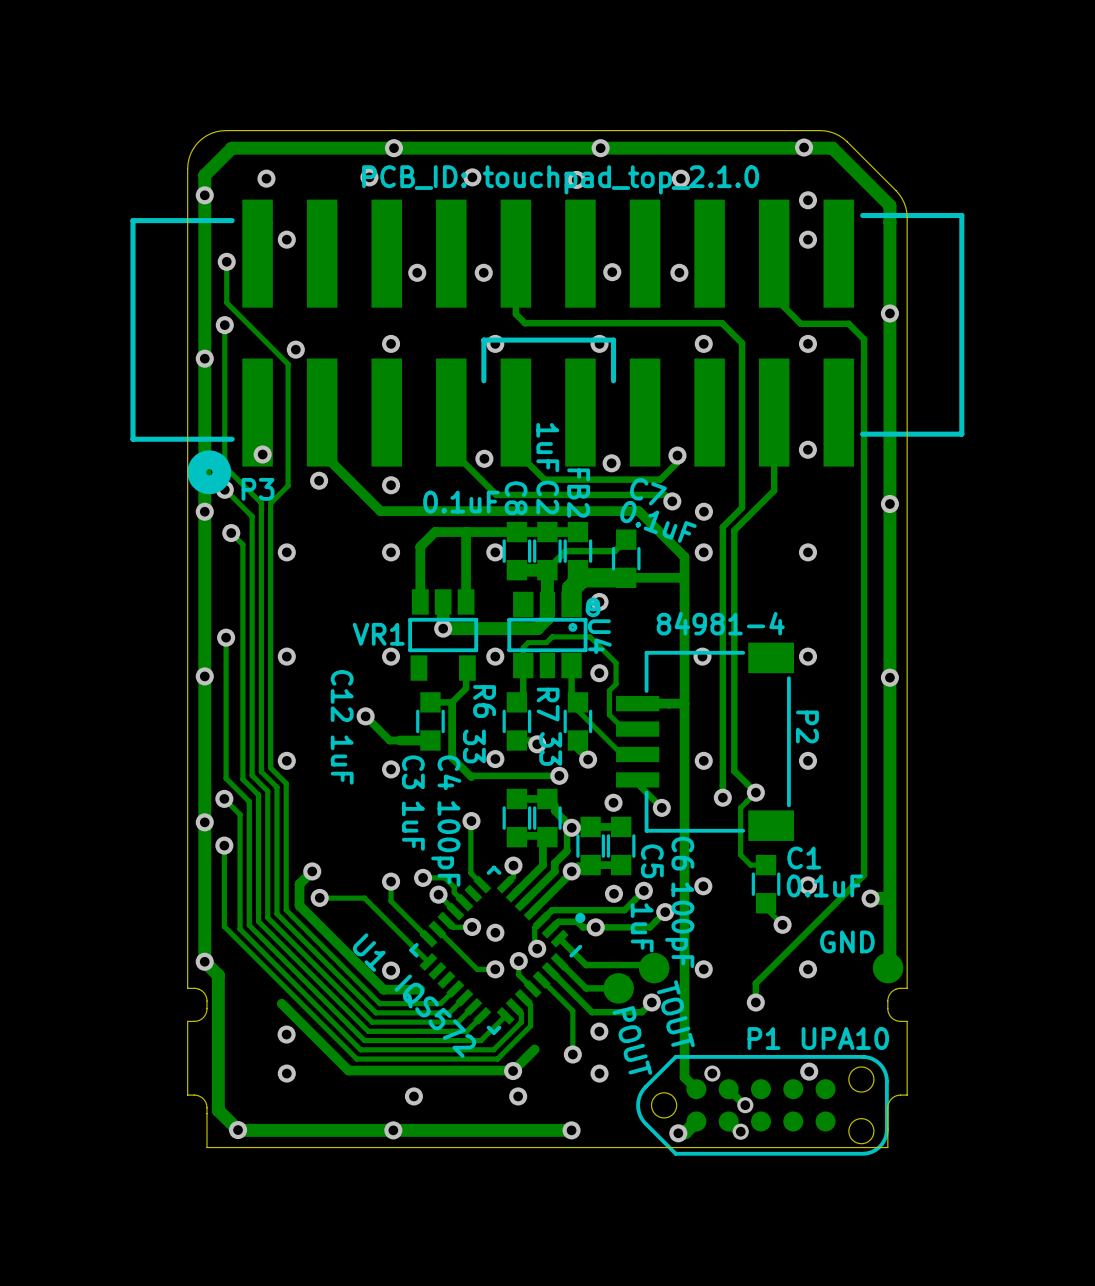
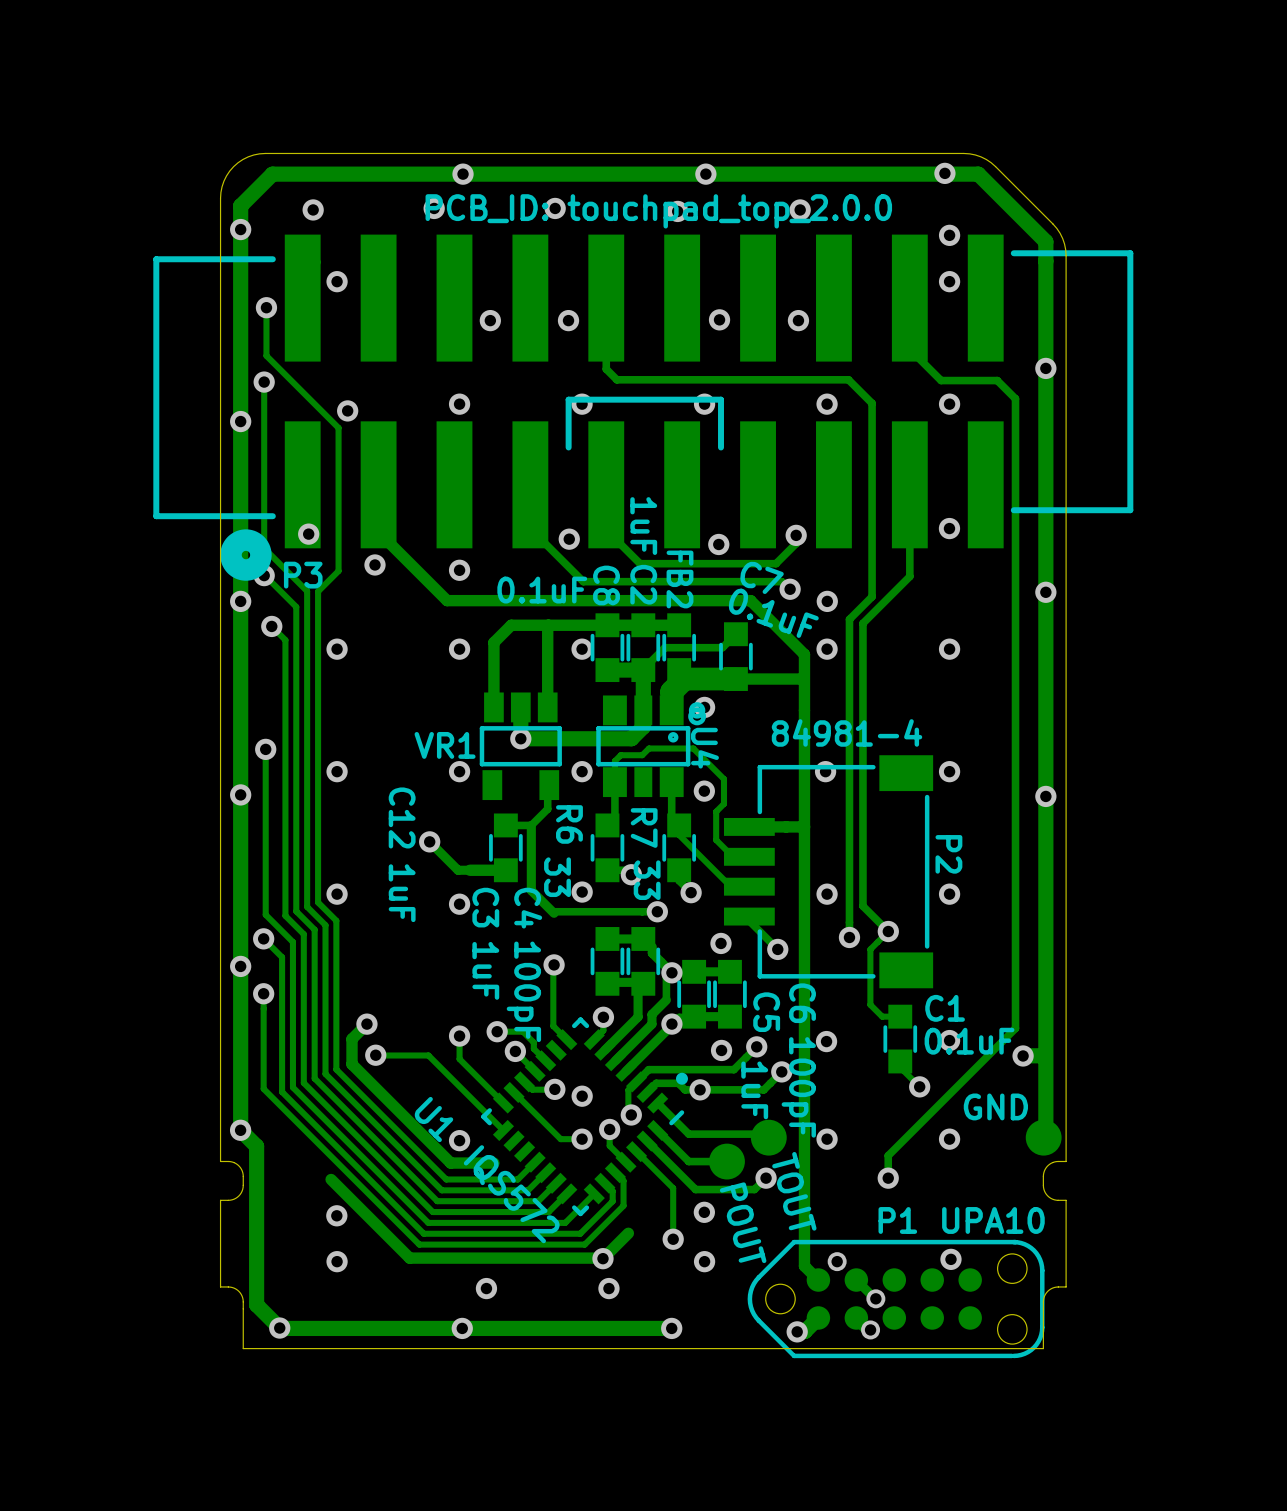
text: PCB_ID: touchpad_top_2.1.0 (560, 179) -> PCB_ID: touchpad_top_2.0.0 (658, 211)

